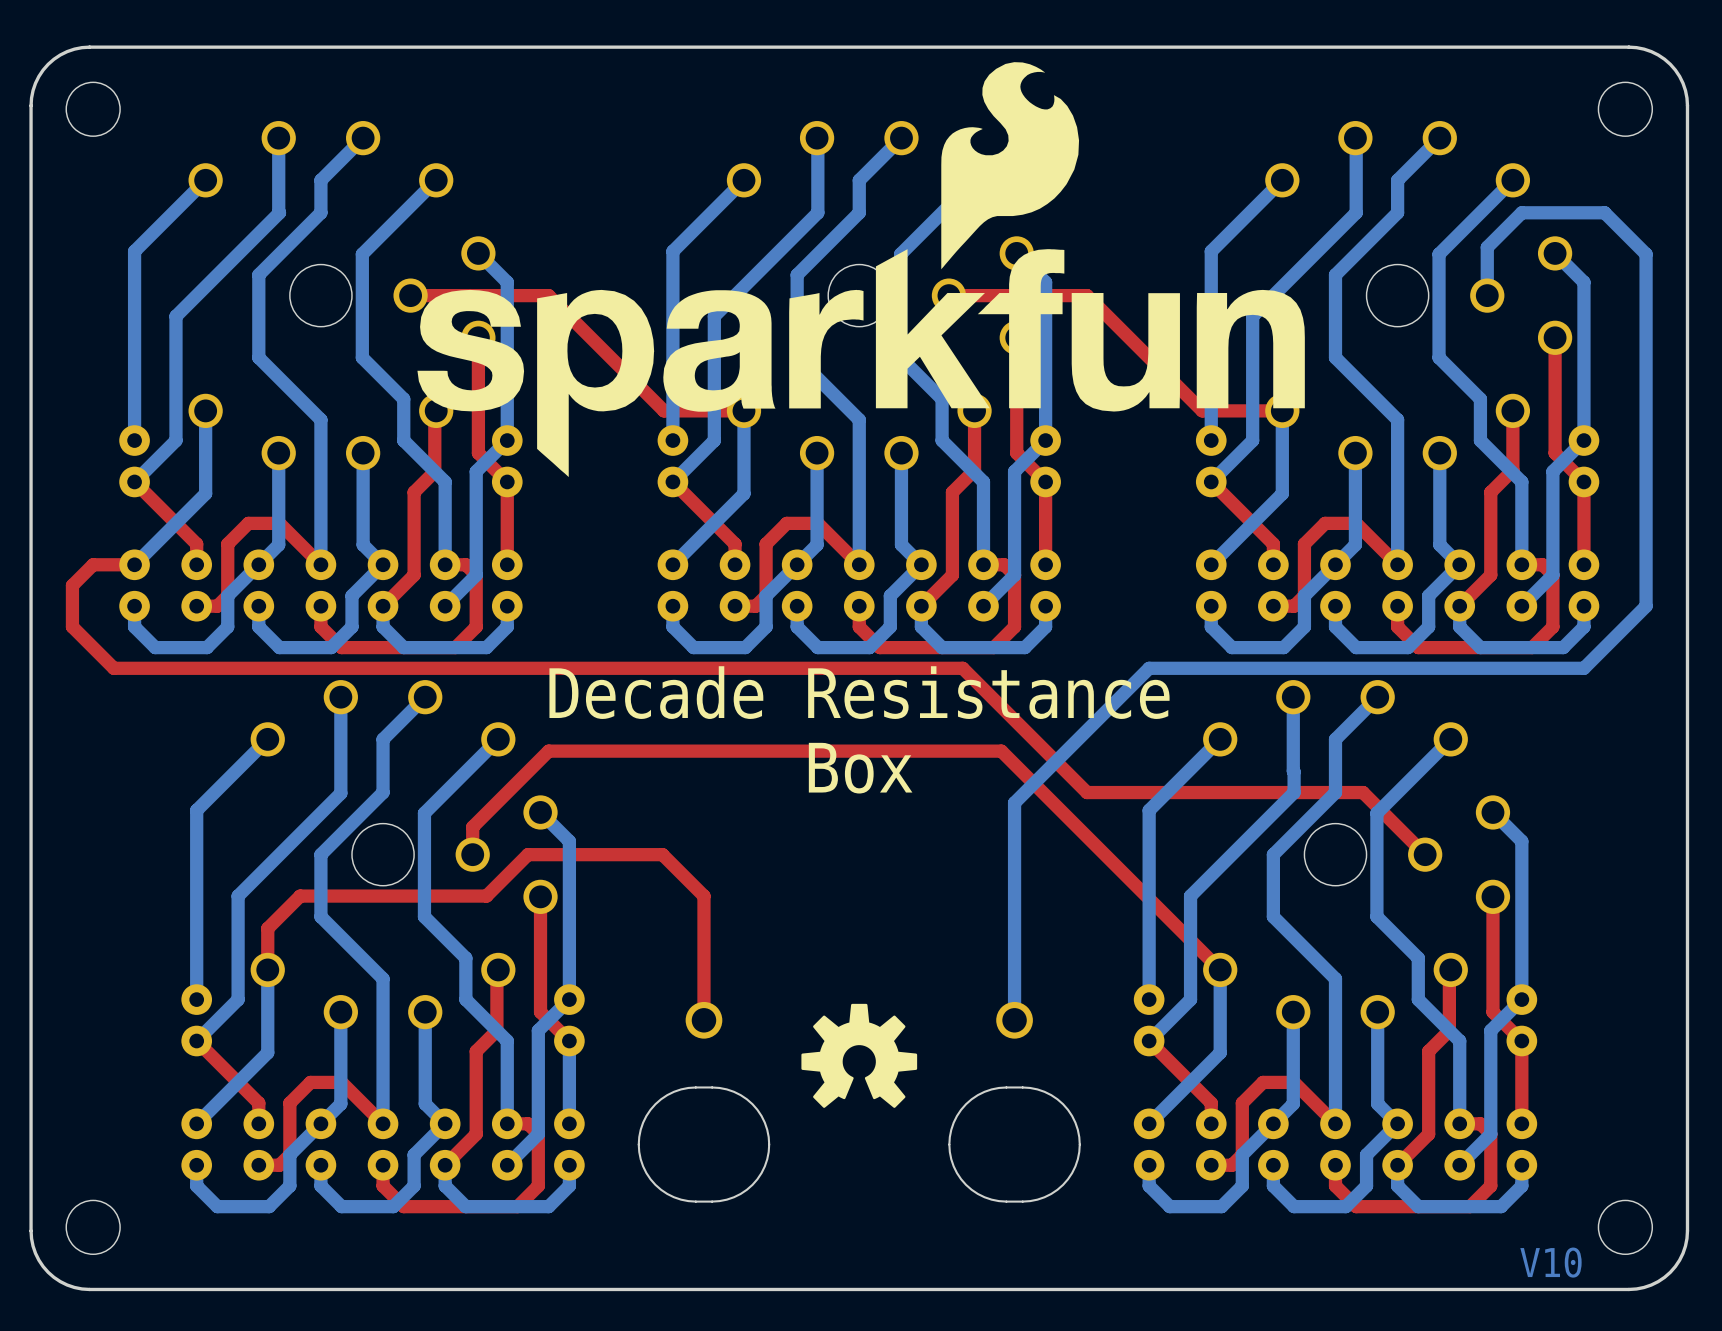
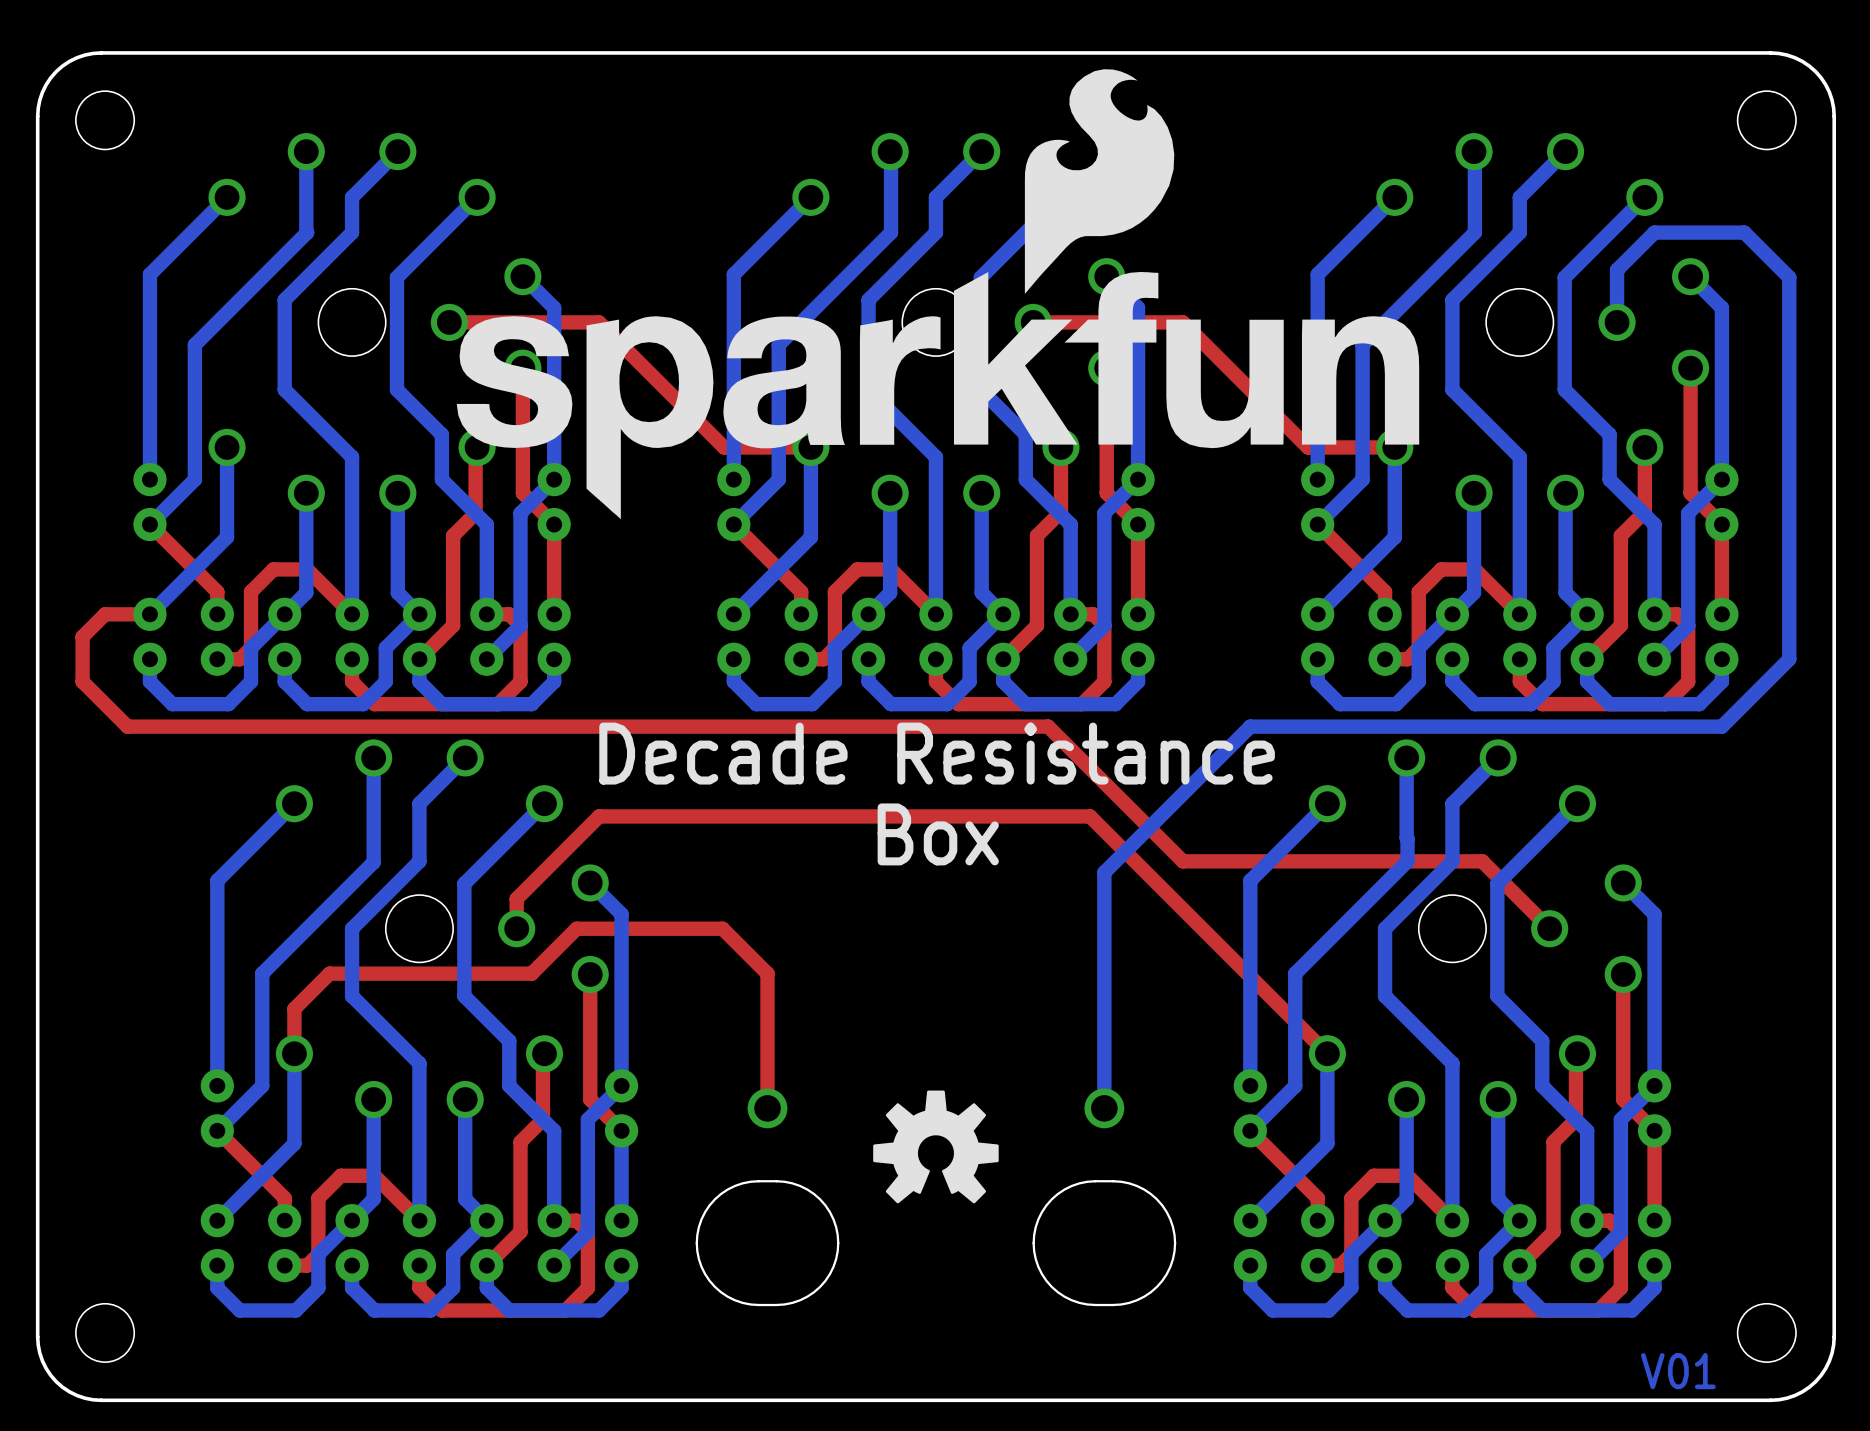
text: V10 (1550, 1262) -> V01 (1678, 1371)

